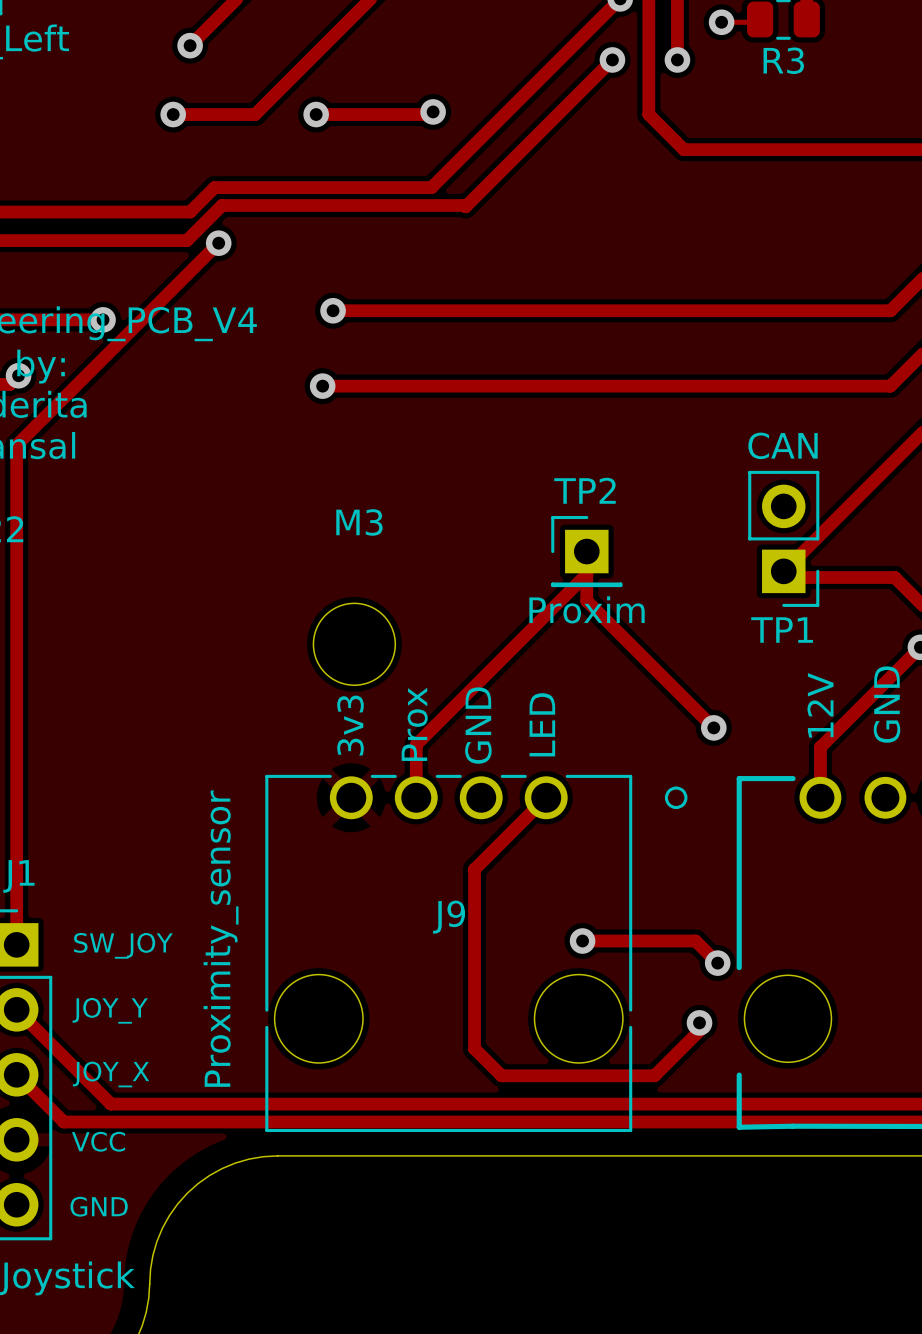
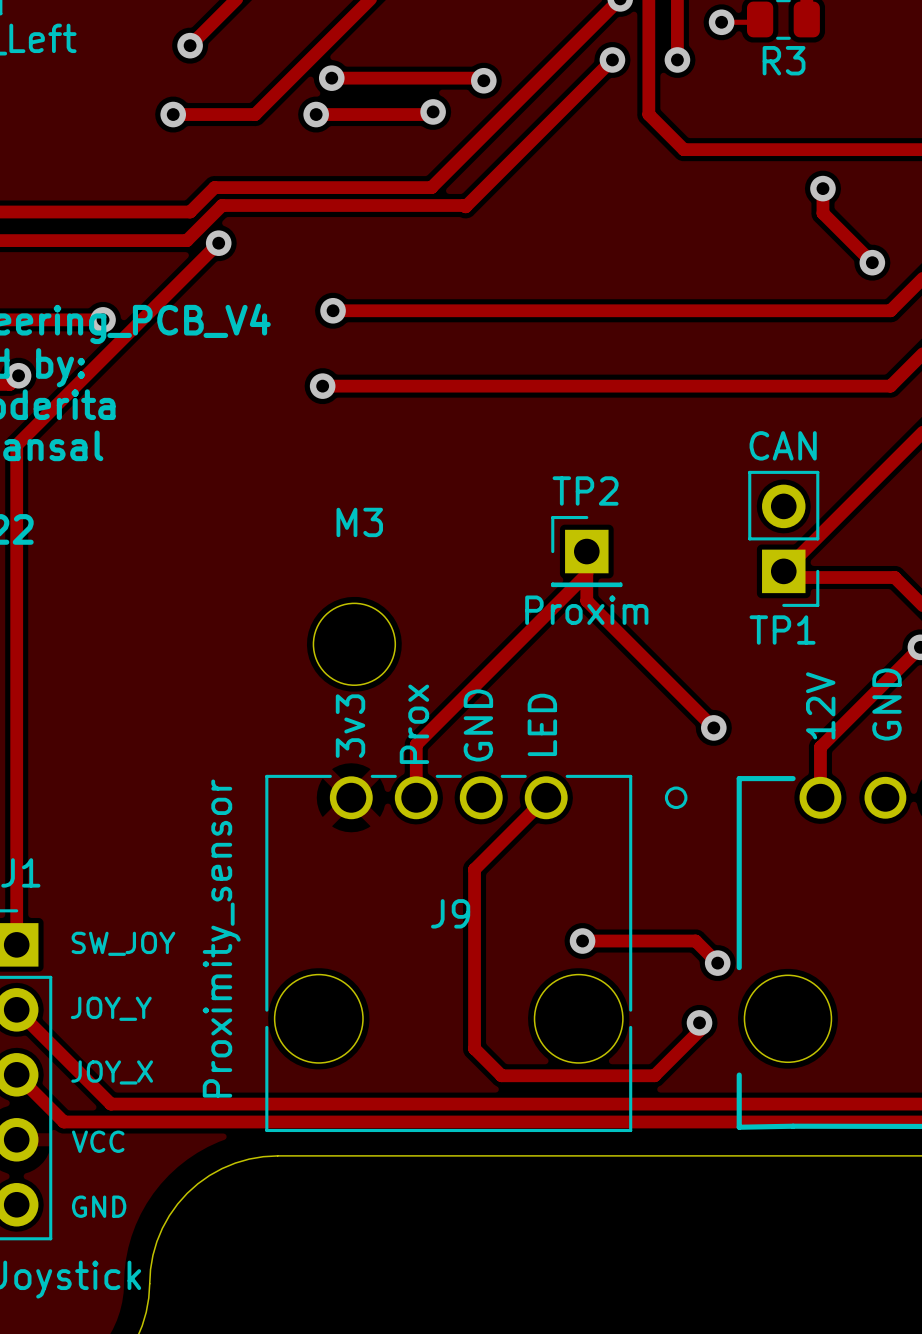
track: none -> (331, 78) (481, 78) (483, 80)
via: none -> (331, 78)
via: none -> (483, 80)
track: none -> (822, 188) (822, 213) (872, 262)
via: none -> (822, 188)
via: none -> (872, 262)

